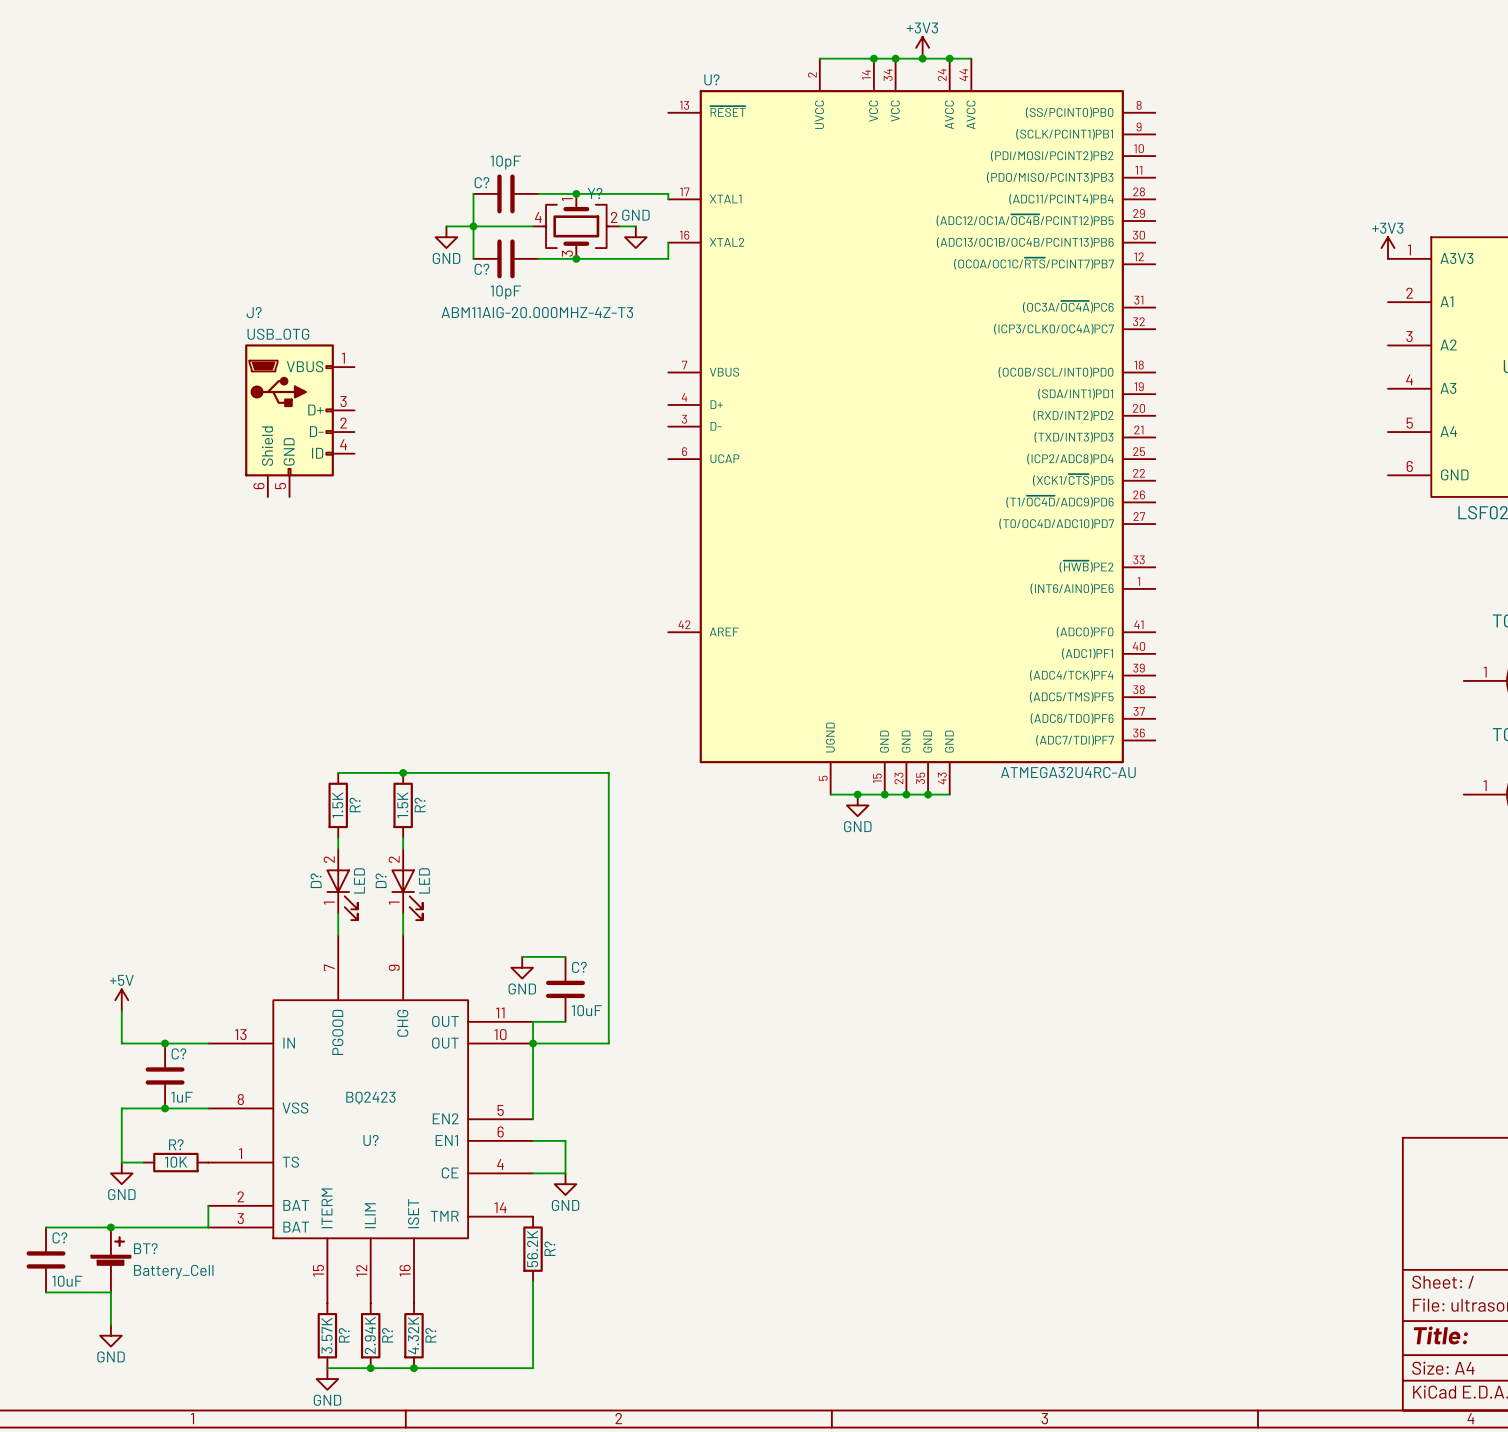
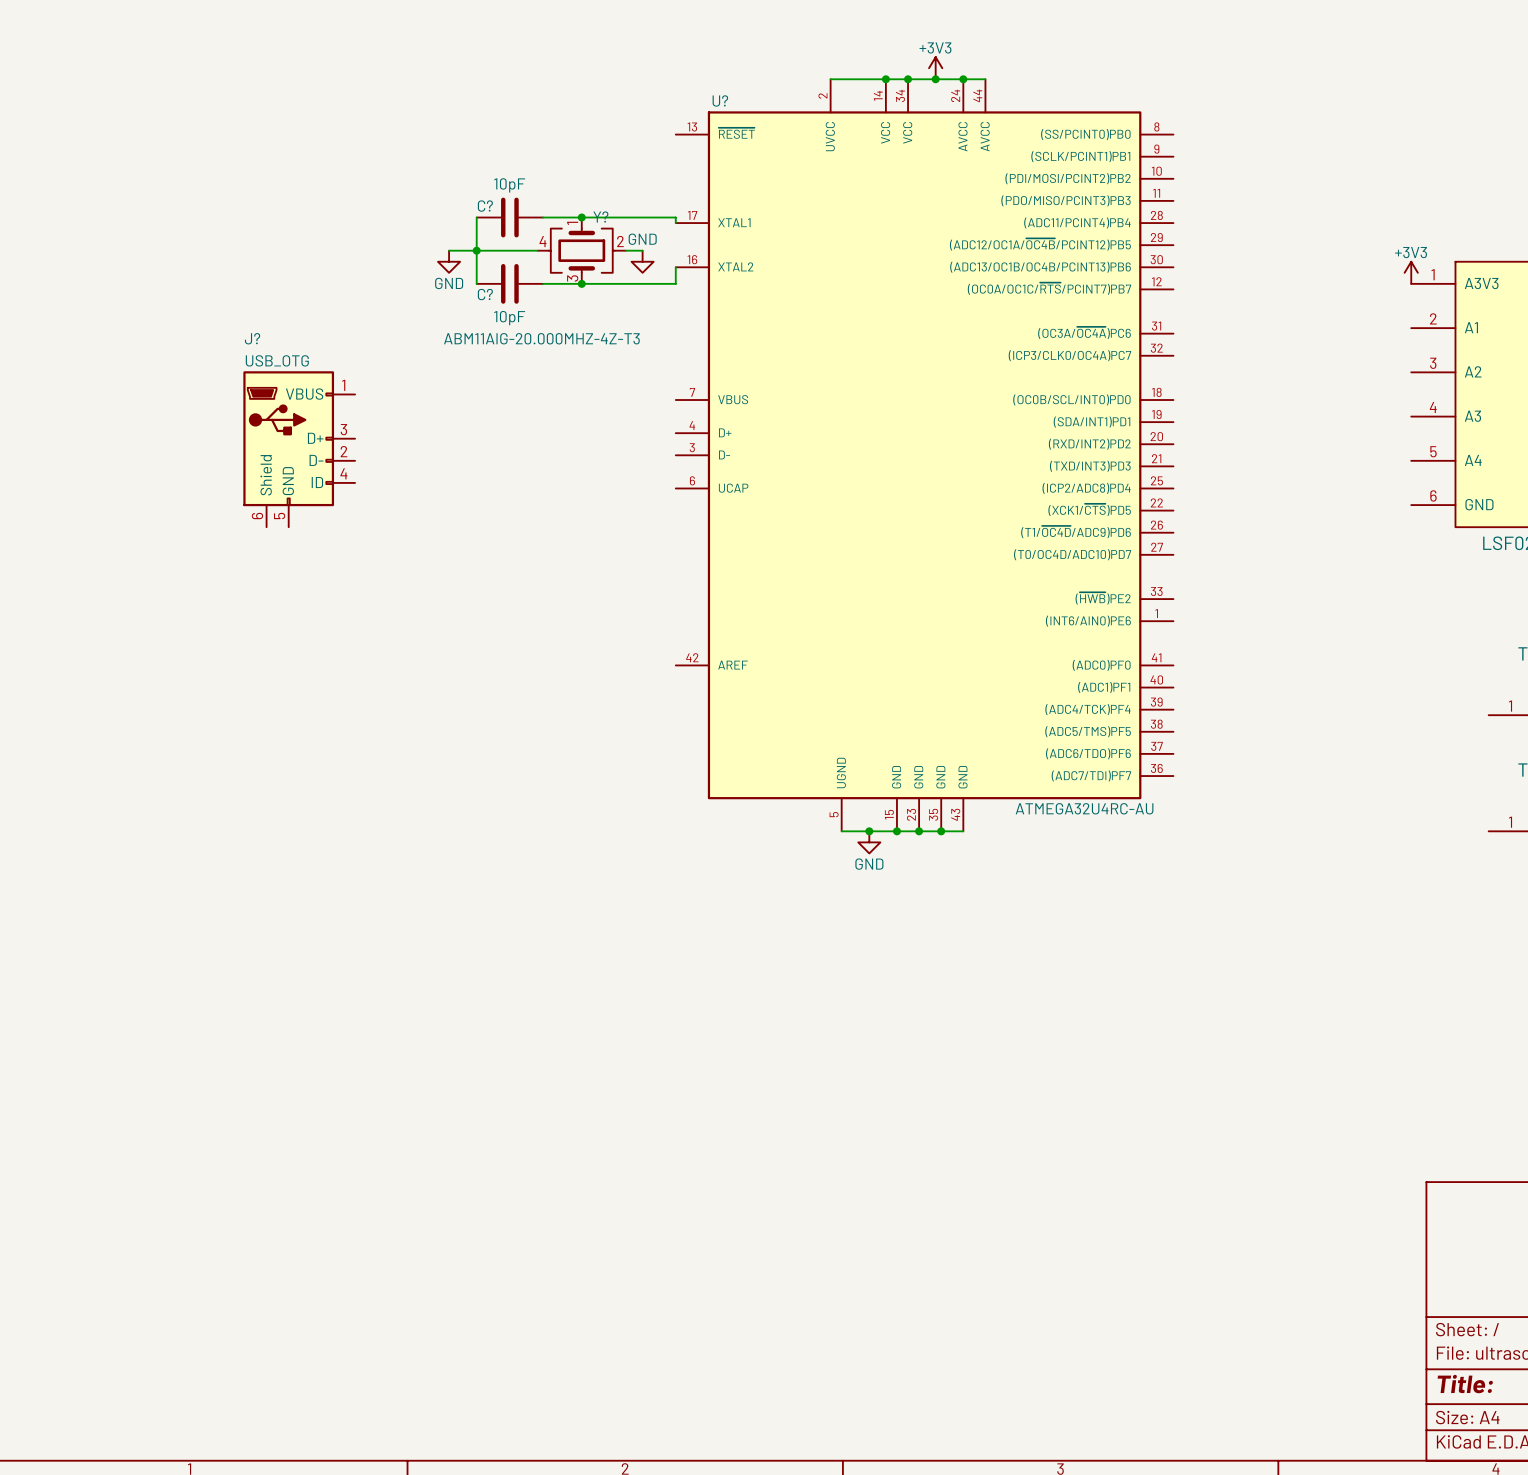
wire: (338, 772) (608, 772) (608, 1043) (533, 1043) -> none
junction: (403, 772) -> none
R?: 1.5K (338, 805) -> none
R?: 1.5K (403, 805) -> none
wire: (338, 837) (338, 848) -> none
wire: (403, 837) (403, 848) -> none
D?: LED (342, 884) -> none
D?: LED (407, 884) -> none
wire: (338, 913) (338, 935) -> none
wire: (403, 913) (403, 935) -> none
wire: (522, 956) (565, 956) -> none
power symbol: GND (522, 967) -> none
C?: 10uF (565, 989) -> none
power symbol: +5V (121, 1000) -> none
wire: (121, 1011) (121, 1043) (208, 1043) -> none
wire: (565, 1021) (533, 1021) (533, 1119) -> none
junction: (165, 1043) -> none
junction: (533, 1043) -> none
C?: 1uF (165, 1075) -> none
junction: (165, 1108) -> none
wire: (208, 1108) (121, 1108) (121, 1162) (143, 1162) -> none
U?: BQ2423 (370, 1119) -> none
wire: (533, 1140) (565, 1140) (565, 1173) (533, 1173) -> none
R?: 10K (175, 1162) -> none
power symbol: GND (121, 1173) -> none
power symbol: GND (565, 1184) -> none
wire: (208, 1205) (208, 1227) (46, 1227) -> none
junction: (110, 1227) -> none
R?: 56.2K (533, 1249) -> none
C?: 10uF (46, 1259) -> none
BT?: Battery_Cell (110, 1259) -> none
wire: (533, 1281) (533, 1368) (327, 1368) -> none
wire: (46, 1292) (110, 1292) (110, 1324) -> none
power symbol: GND (110, 1335) -> none
R?: 3.57K (327, 1335) -> none
R?: 2.94K (370, 1335) -> none
R?: 4.32K (413, 1335) -> none
junction: (370, 1368) -> none
junction: (413, 1368) -> none
power symbol: GND (327, 1379) -> none

